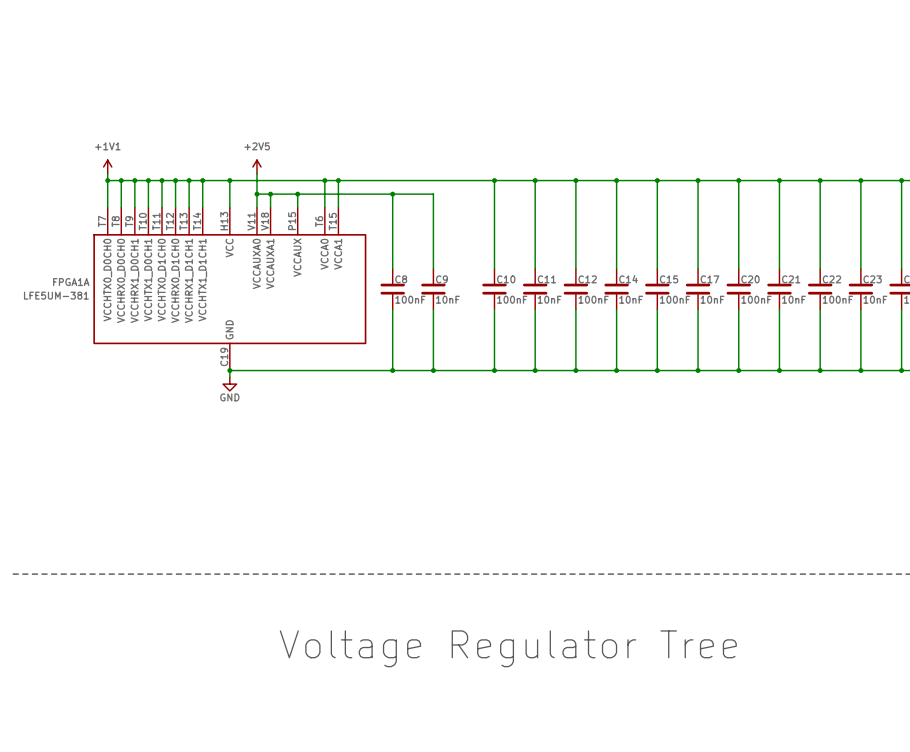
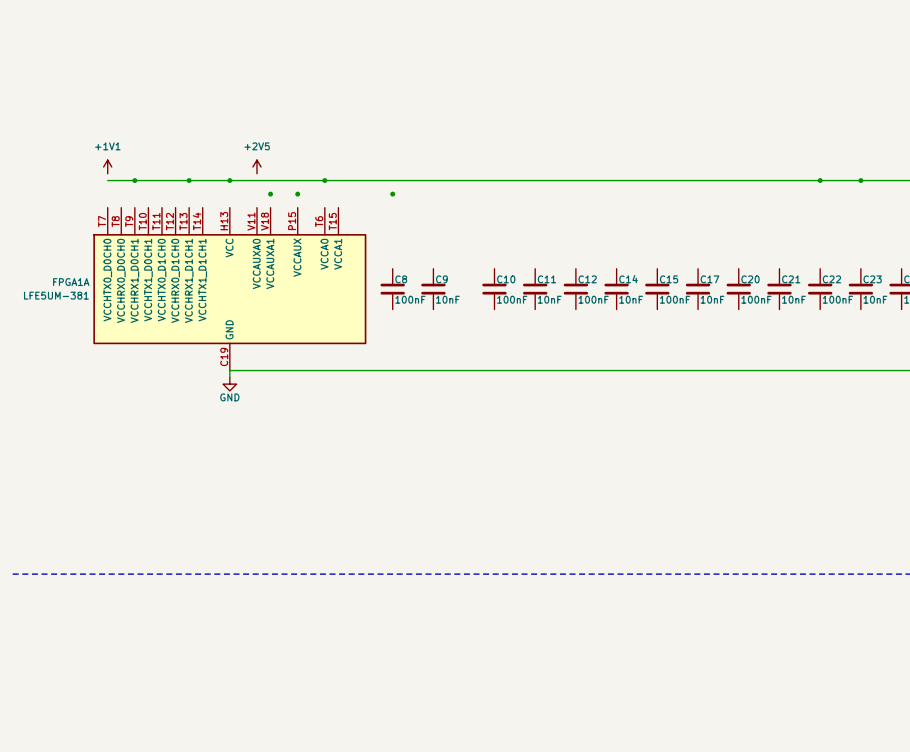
wire: (107, 173) (107, 207) -> none
wire: (256, 173) (256, 207) -> none
junction: (107, 180) -> none
wire: (121, 180) (121, 207) -> none
junction: (121, 180) -> none
wire: (134, 180) (134, 207) -> none
wire: (148, 180) (148, 207) -> none
junction: (148, 180) -> none
wire: (161, 180) (161, 207) -> none
junction: (161, 180) -> none
wire: (175, 180) (175, 207) -> none
junction: (175, 180) -> none
wire: (189, 180) (189, 207) -> none
wire: (202, 180) (202, 207) -> none
junction: (202, 180) -> none
wire: (229, 180) (229, 207) -> none
wire: (324, 180) (324, 207) -> none
wire: (338, 180) (338, 207) -> none
junction: (338, 180) -> none
wire: (494, 180) (494, 268) -> none
junction: (494, 180) -> none
wire: (535, 180) (535, 268) -> none
junction: (535, 180) -> none
wire: (575, 180) (575, 268) -> none
junction: (575, 180) -> none
wire: (616, 180) (616, 268) -> none
junction: (616, 180) -> none
wire: (657, 180) (657, 268) -> none
junction: (657, 180) -> none
wire: (698, 180) (698, 268) -> none
junction: (698, 180) -> none
wire: (738, 180) (738, 268) -> none
junction: (738, 180) -> none
wire: (779, 180) (779, 268) -> none
junction: (779, 180) -> none
wire: (820, 180) (820, 268) -> none
wire: (860, 180) (860, 268) -> none
wire: (901, 180) (901, 268) -> none
junction: (901, 180) -> none
wire: (256, 194) (433, 194) (433, 268) -> none
junction: (256, 194) -> none
wire: (270, 194) (270, 207) -> none
wire: (297, 194) (297, 207) -> none
wire: (392, 194) (392, 268) -> none
wire: (392, 309) (392, 370) -> none
wire: (433, 309) (433, 370) -> none
wire: (494, 309) (494, 370) -> none
wire: (535, 309) (535, 370) -> none
wire: (575, 309) (575, 370) -> none
wire: (616, 309) (616, 370) -> none
wire: (657, 309) (657, 370) -> none
wire: (698, 309) (698, 370) -> none
wire: (738, 309) (738, 370) -> none
wire: (779, 309) (779, 370) -> none
wire: (820, 309) (820, 370) -> none
wire: (860, 309) (860, 370) -> none
wire: (901, 309) (901, 370) -> none
junction: (229, 370) -> none
junction: (392, 370) -> none
junction: (433, 370) -> none
junction: (494, 370) -> none
junction: (535, 370) -> none
junction: (575, 370) -> none
junction: (616, 370) -> none
junction: (657, 370) -> none
junction: (698, 370) -> none
junction: (738, 370) -> none
junction: (779, 370) -> none
junction: (820, 370) -> none
junction: (860, 370) -> none
junction: (901, 370) -> none
text: Voltage Regulator Tree (508, 648) -> none

